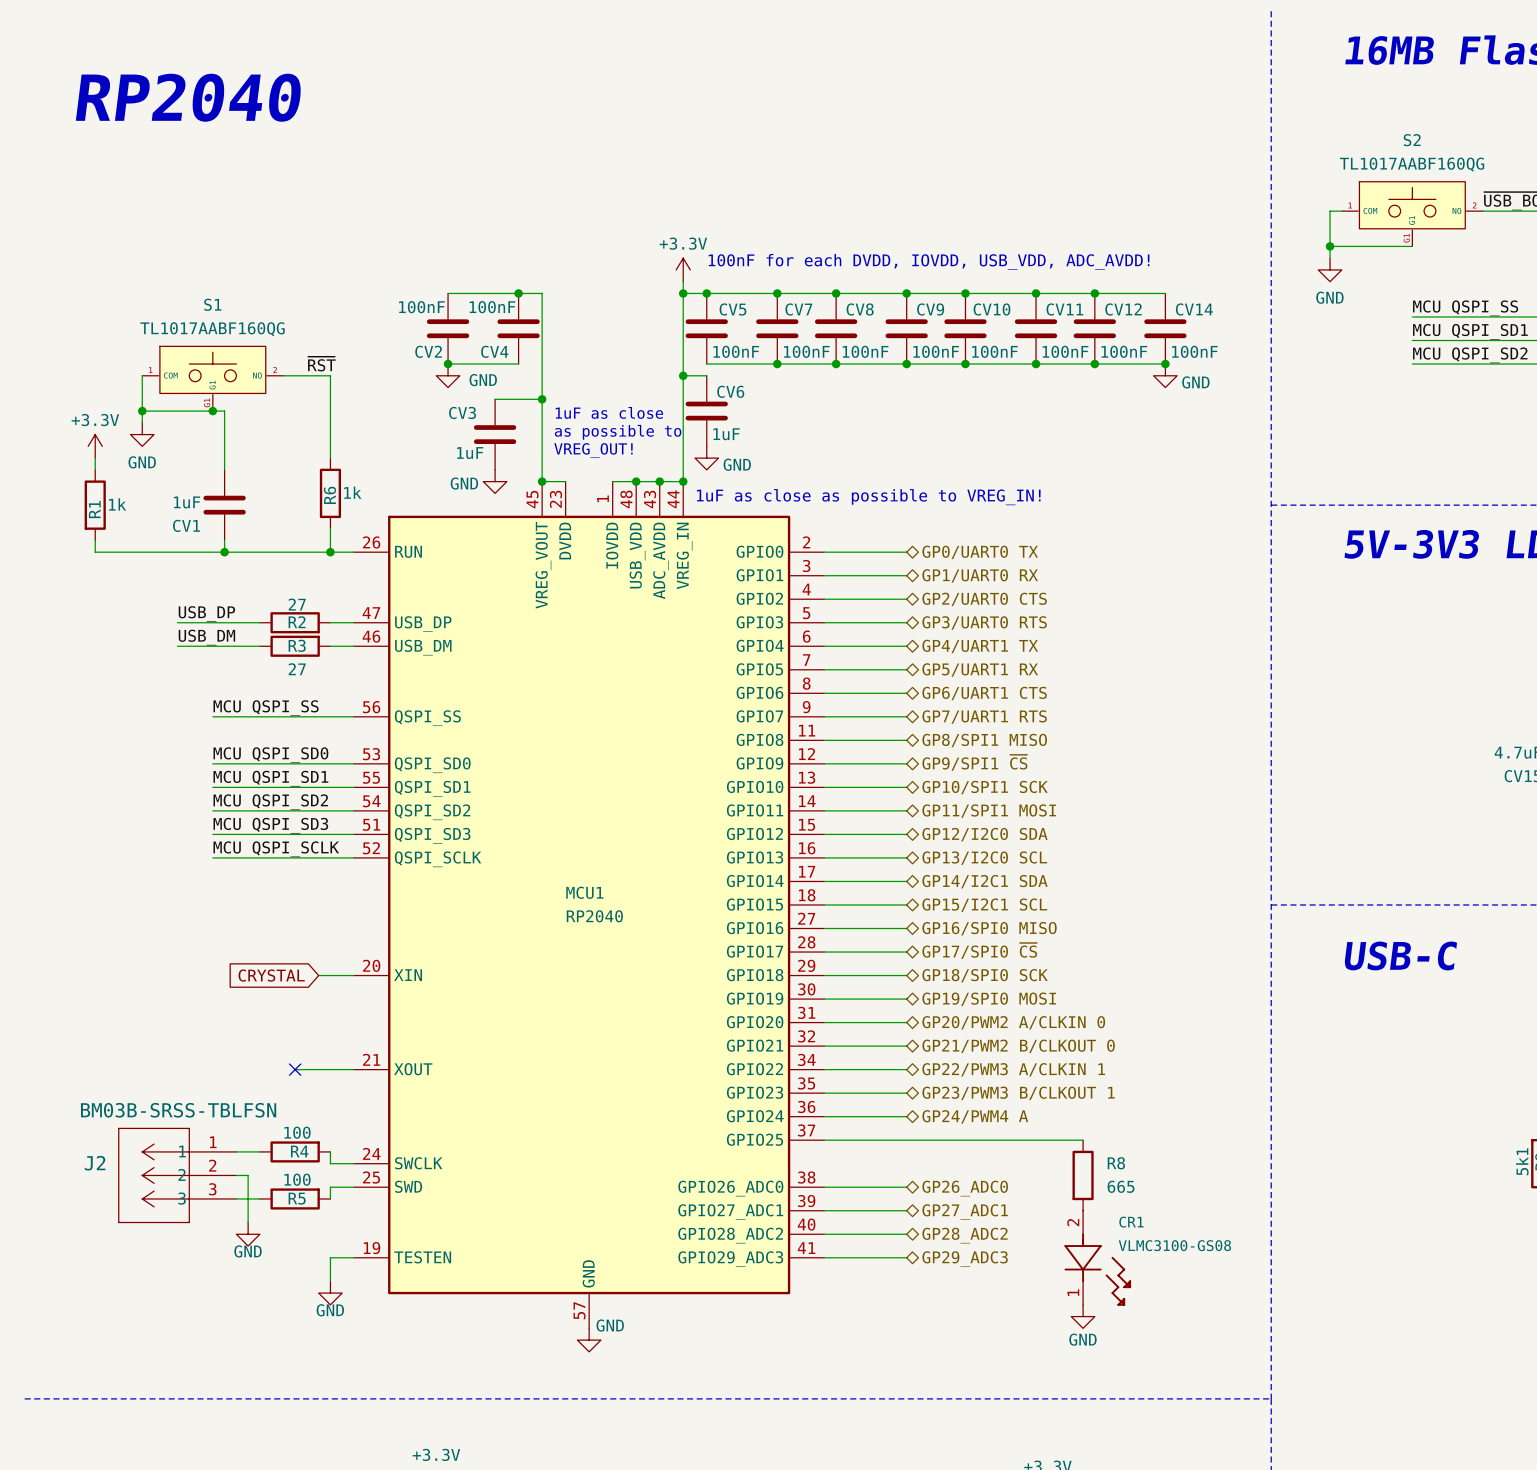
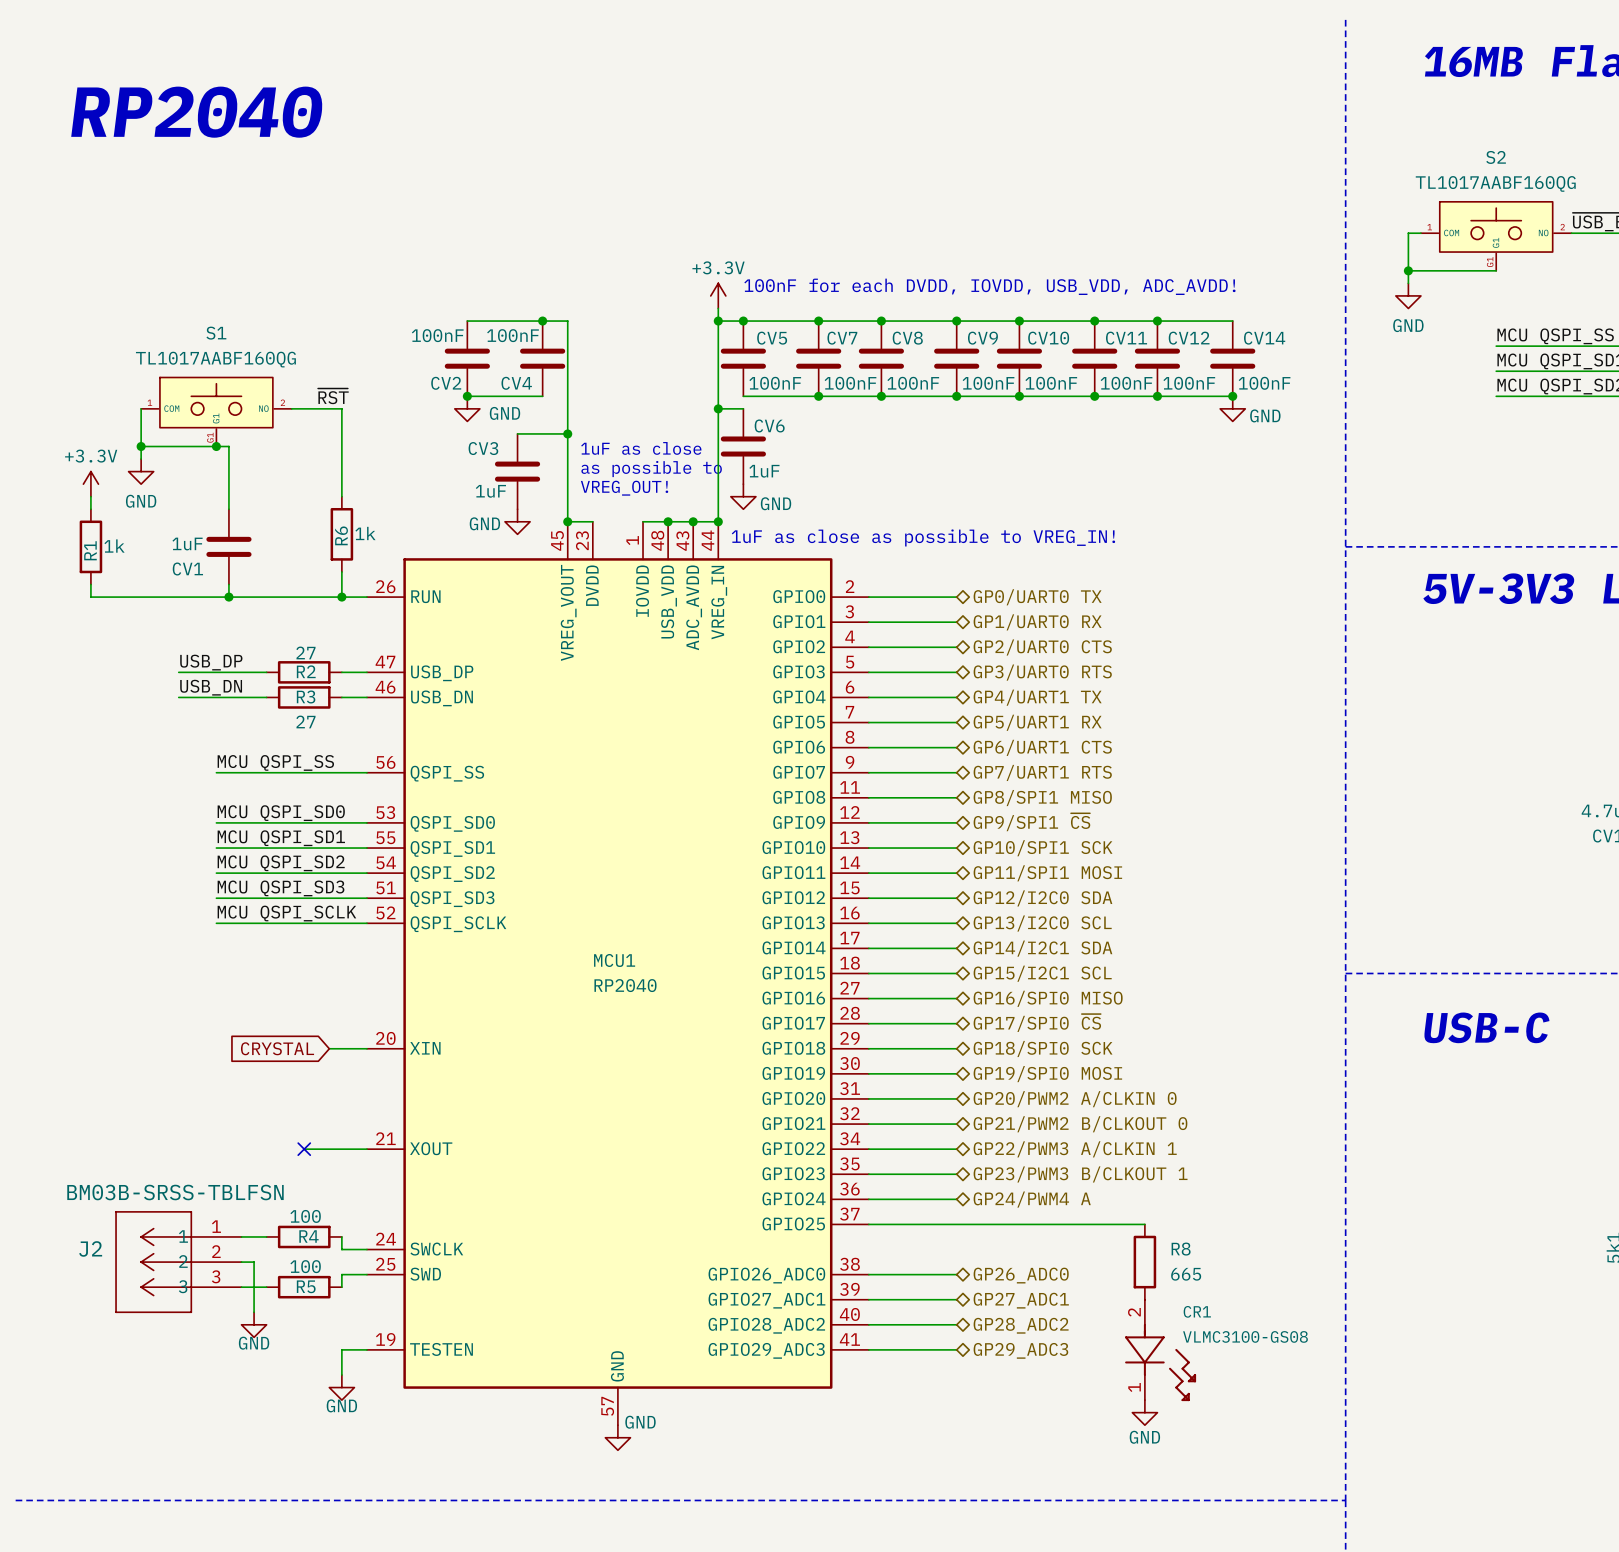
label: USB_DM (206, 637) -> USB_DN (211, 687)
MCU1 pin name: USB_DM (423, 647) -> USB_DN (441, 698)

